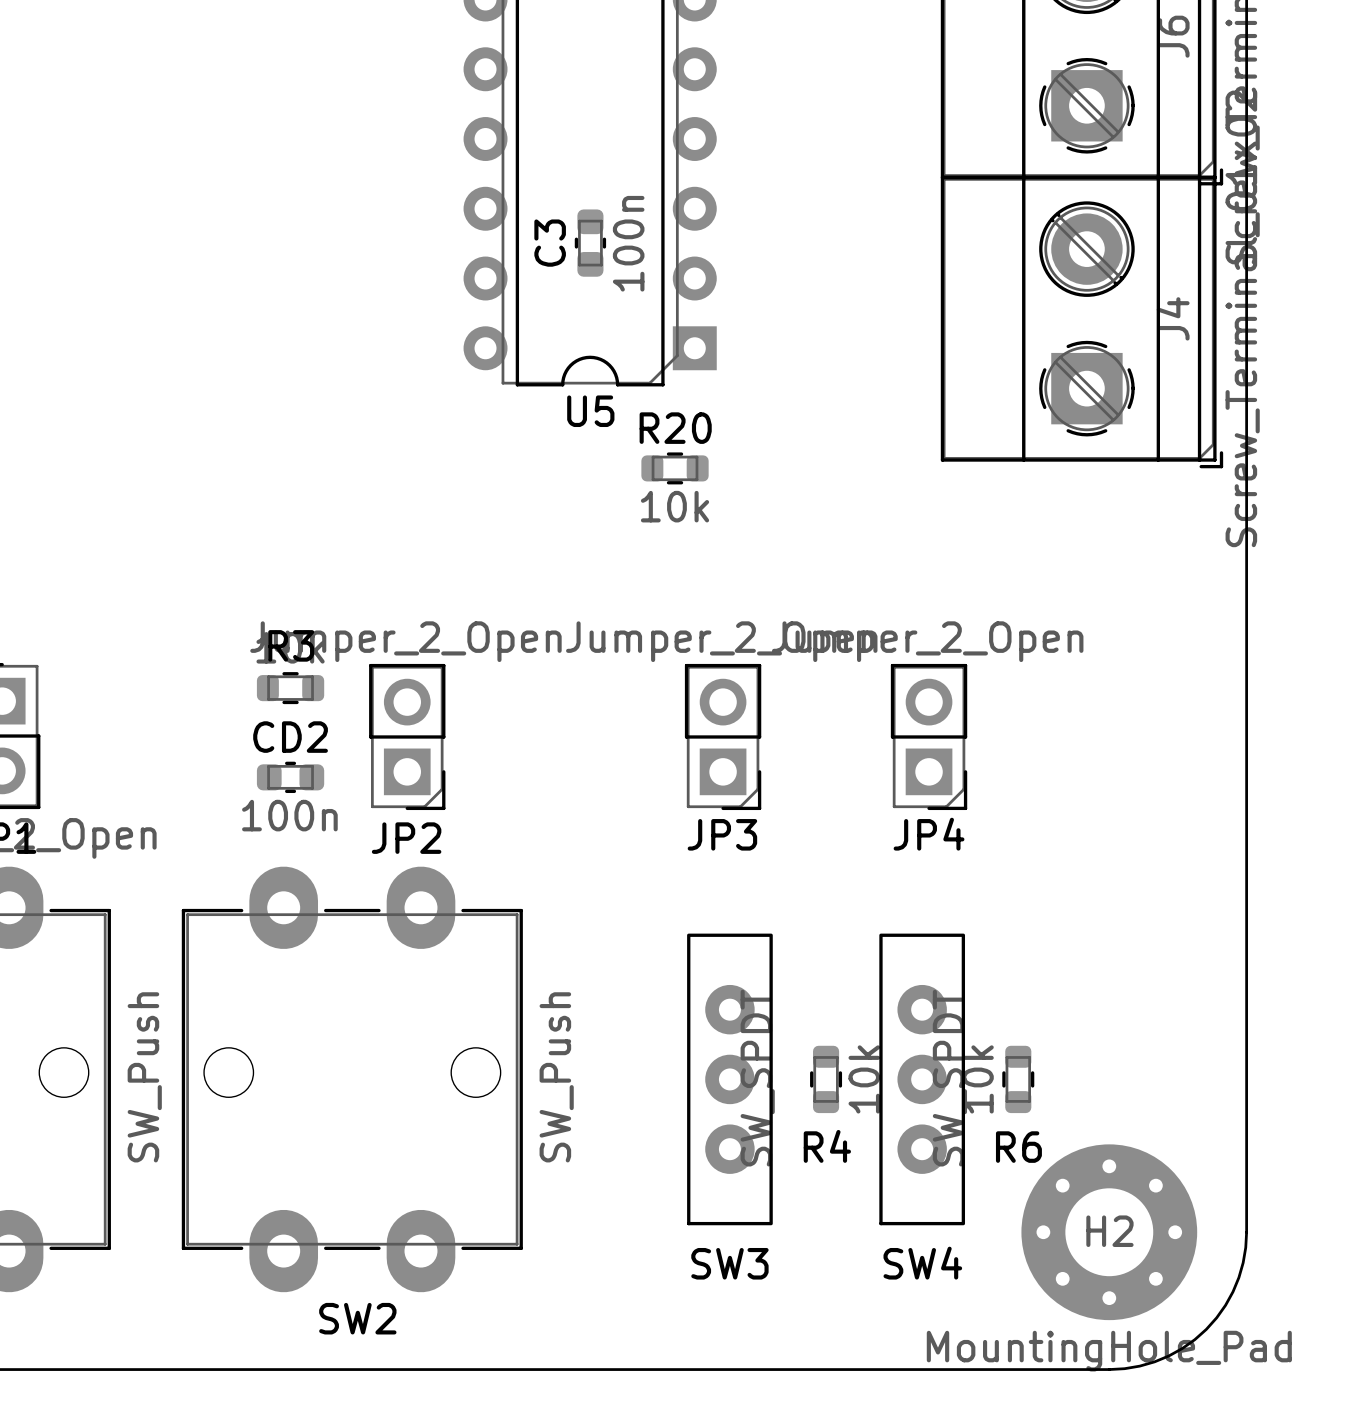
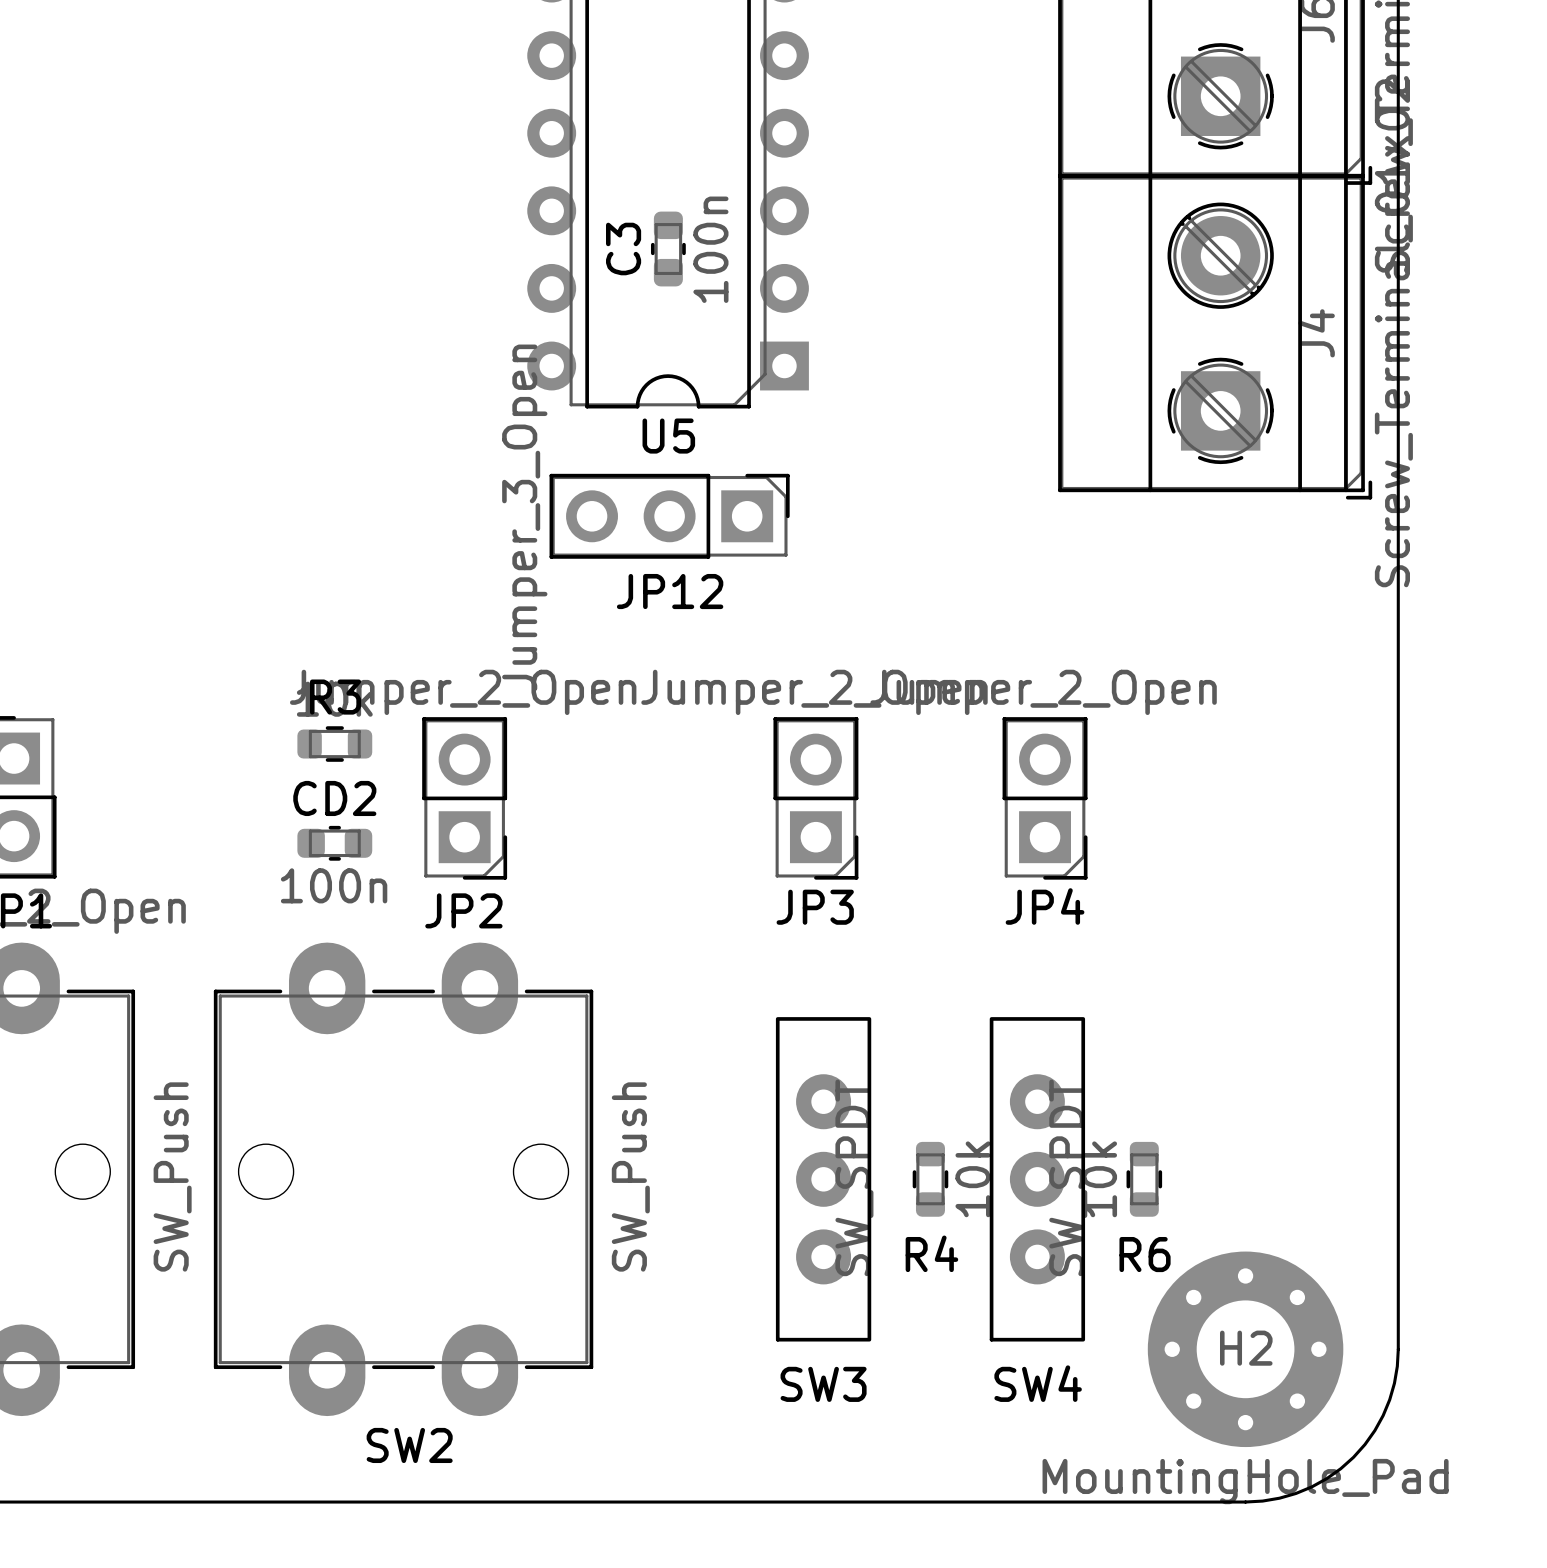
R20: 10k (675, 468) -> none
JP12: none -> Jumper_3_Open (669, 516)

